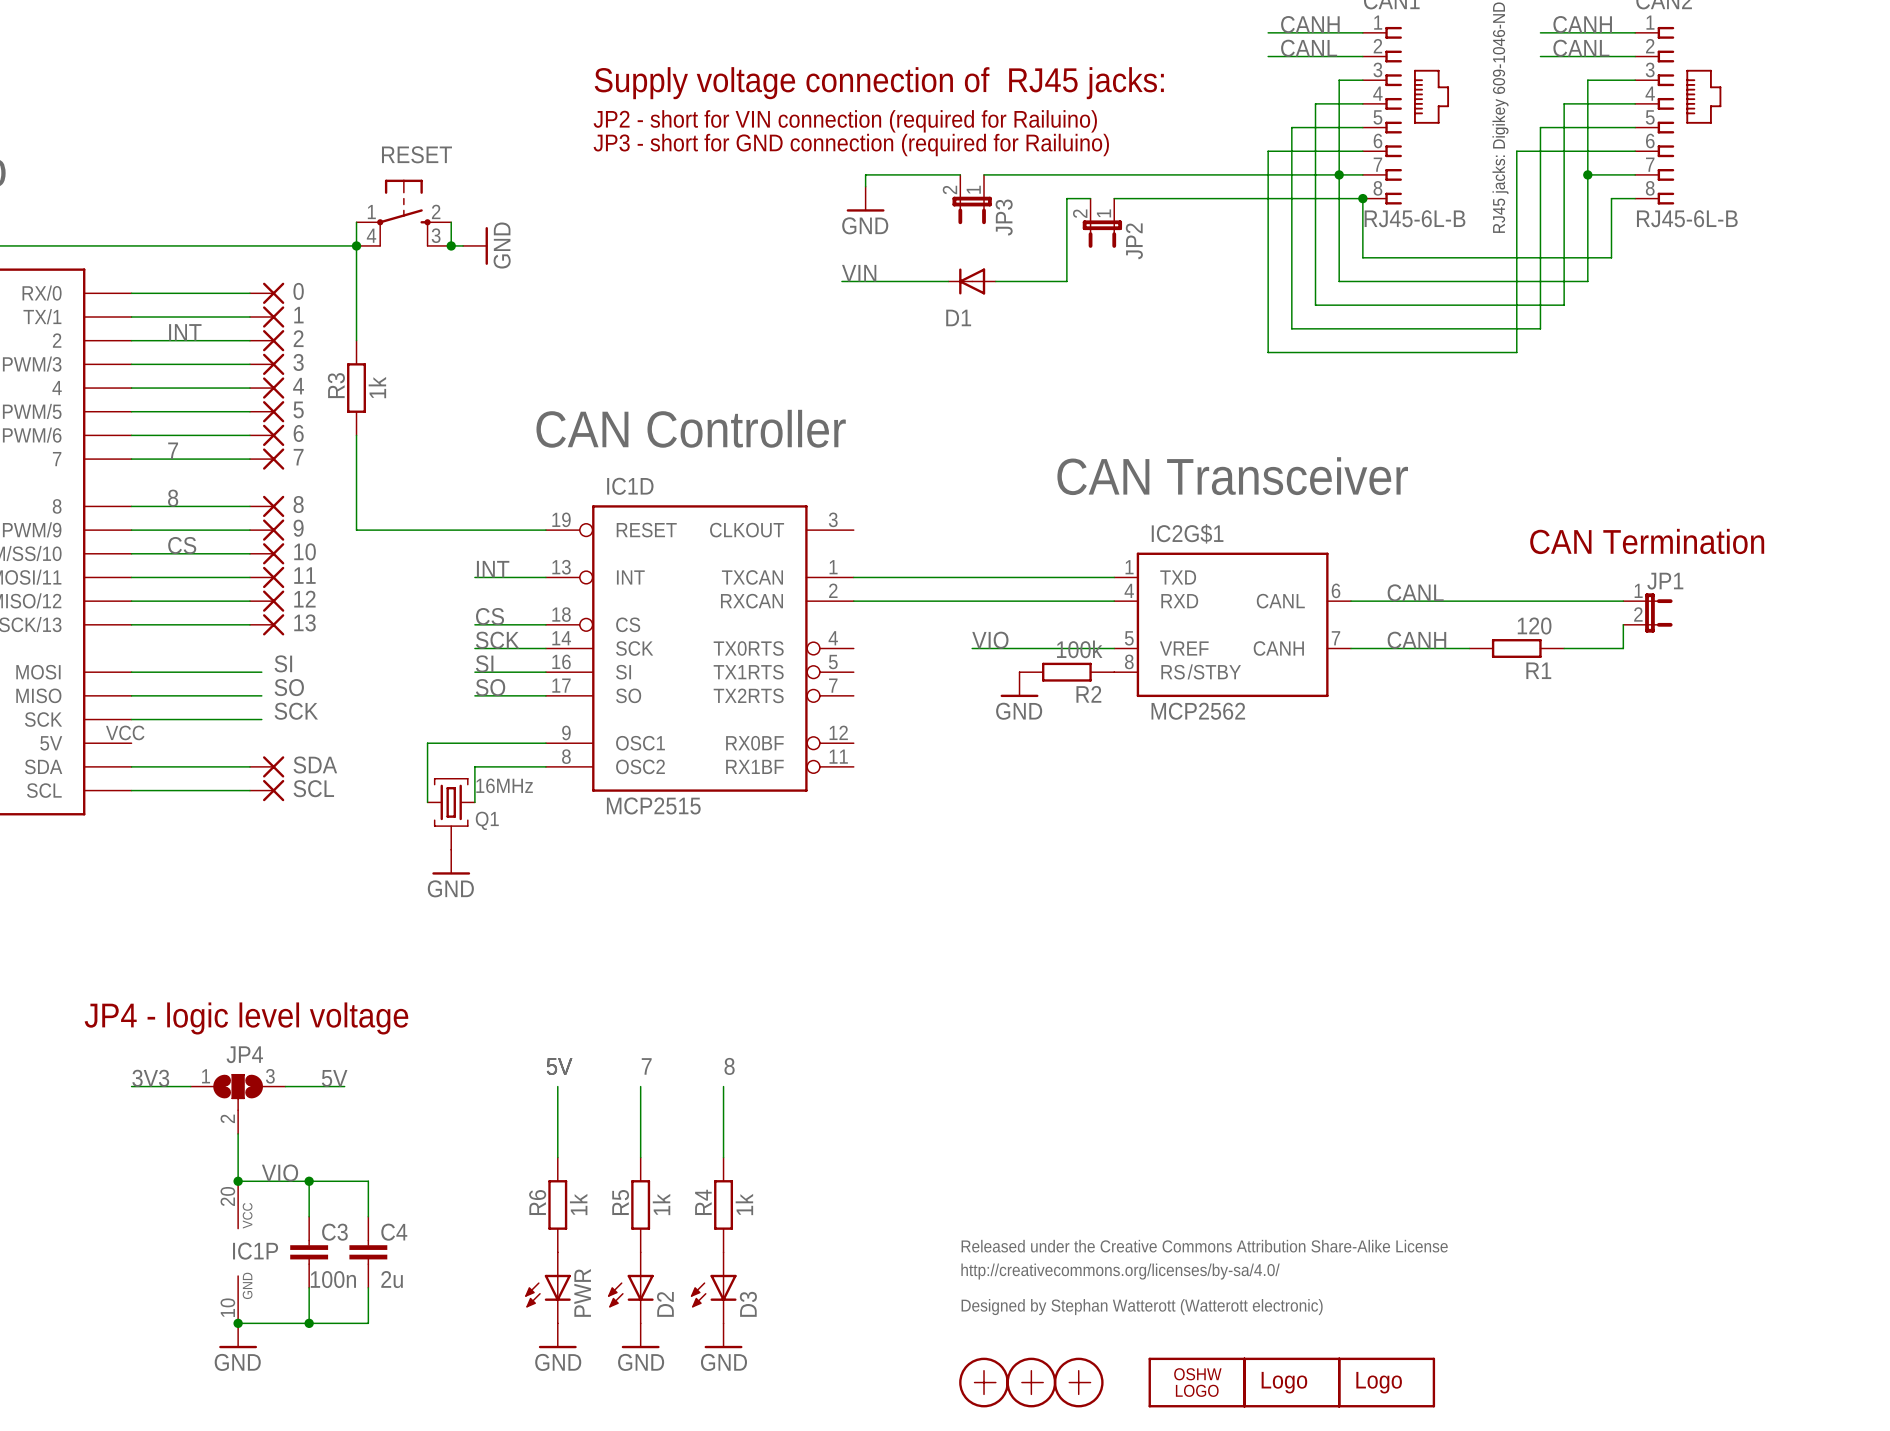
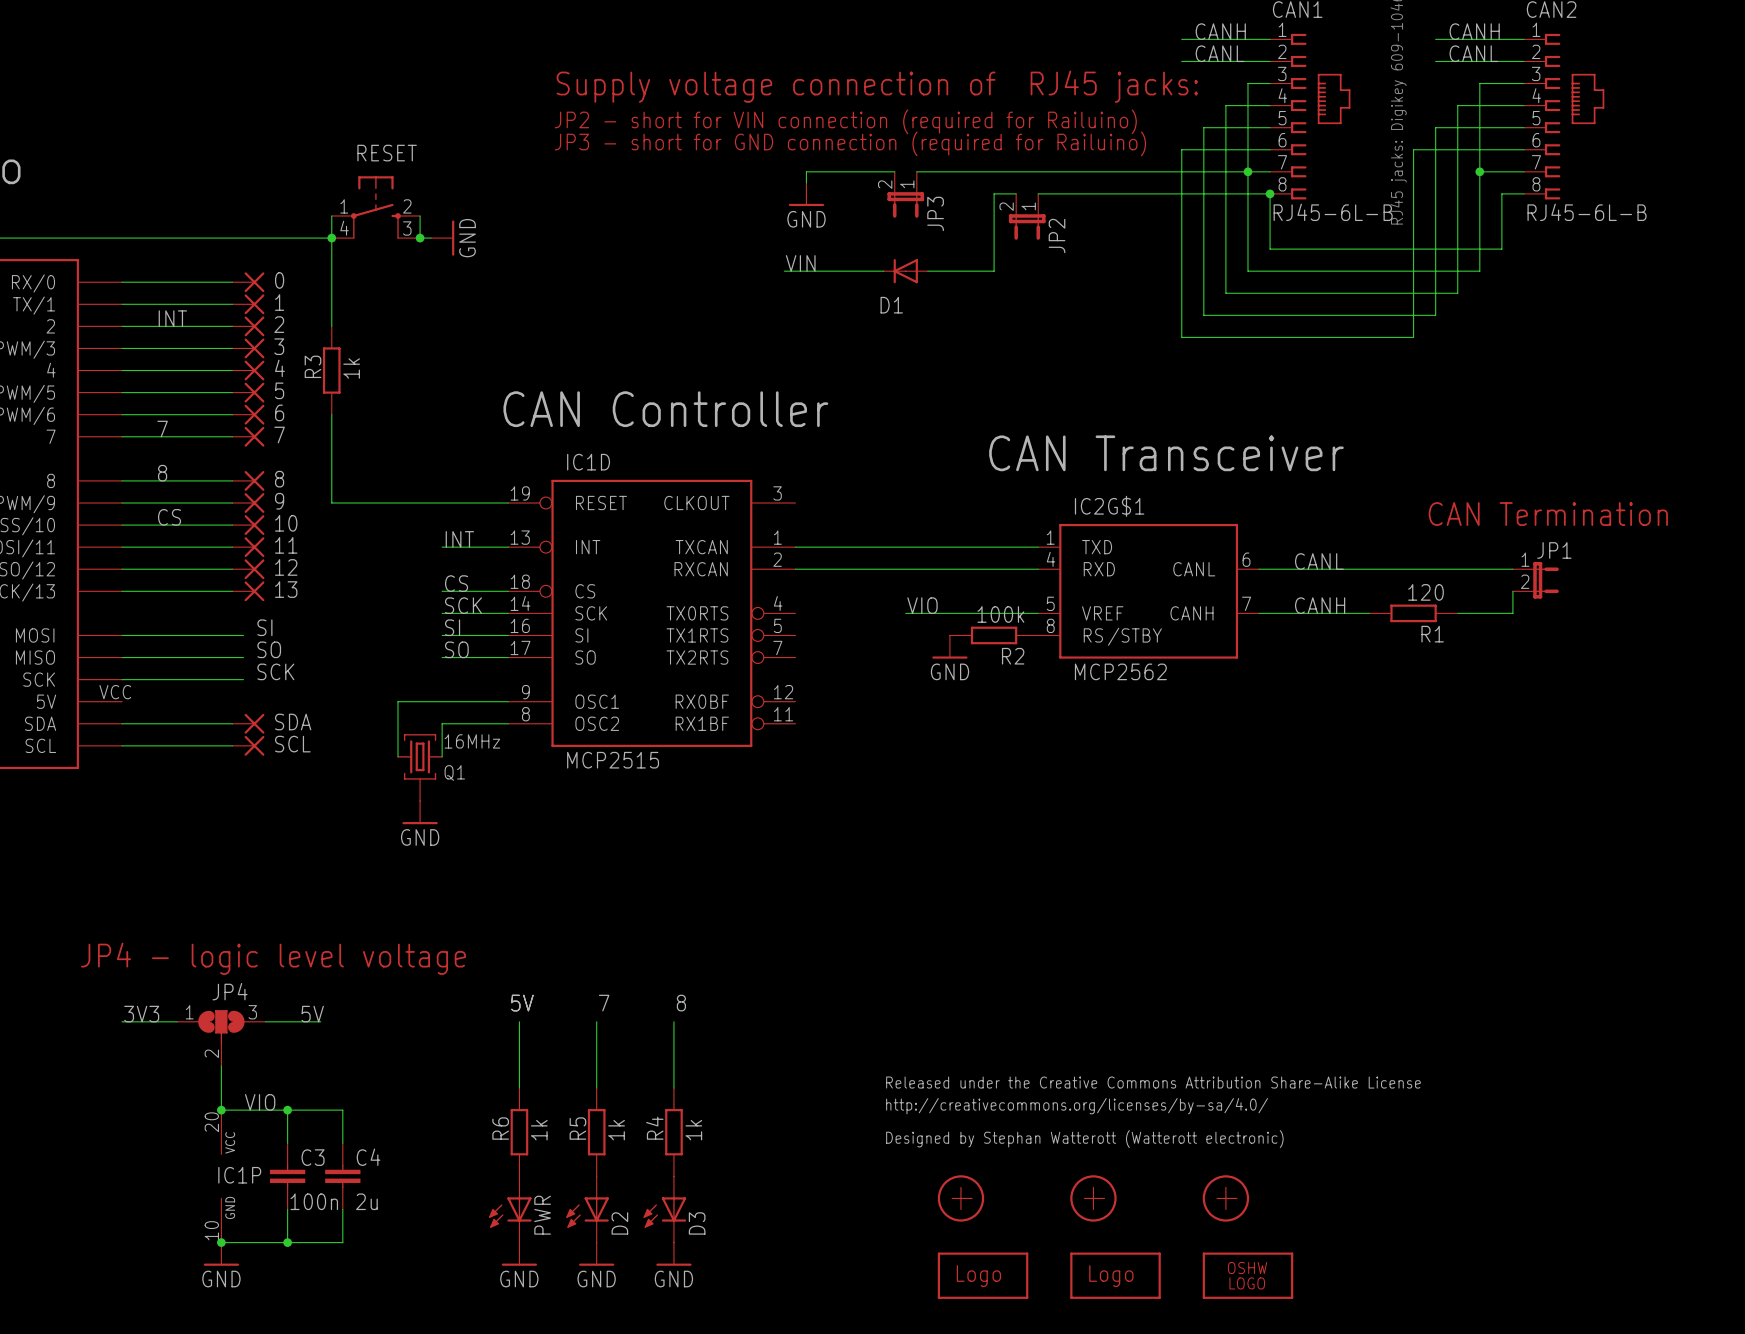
text position: Released under the Creative Commons Attribution Share-Alike License (1204, 1246) -> Released under the Creative Commons Attribution Share-Alike License (1153, 1082)
text position: http://creativecommons.org/licenses/by-sa/4.0/ (1120, 1271) -> http://creativecommons.org/licenses/by-sa/4.0/ (1077, 1106)
part: none -> (960, 1198)
part: none -> (1093, 1198)
part: none -> (1225, 1198)
text position: Designed by Stephan Watterott (Watterott electronic) (1142, 1307) -> Designed by Stephan Watterott (Watterott electronic) (1084, 1139)
part: none -> (983, 1275)
part: none -> (1115, 1275)
part: (984, 1382) -> none
part: (1031, 1382) -> none
part: (1078, 1382) -> none
part position: (1197, 1382) -> (1247, 1275)
part: (1291, 1382) -> none
part: (1386, 1382) -> none

